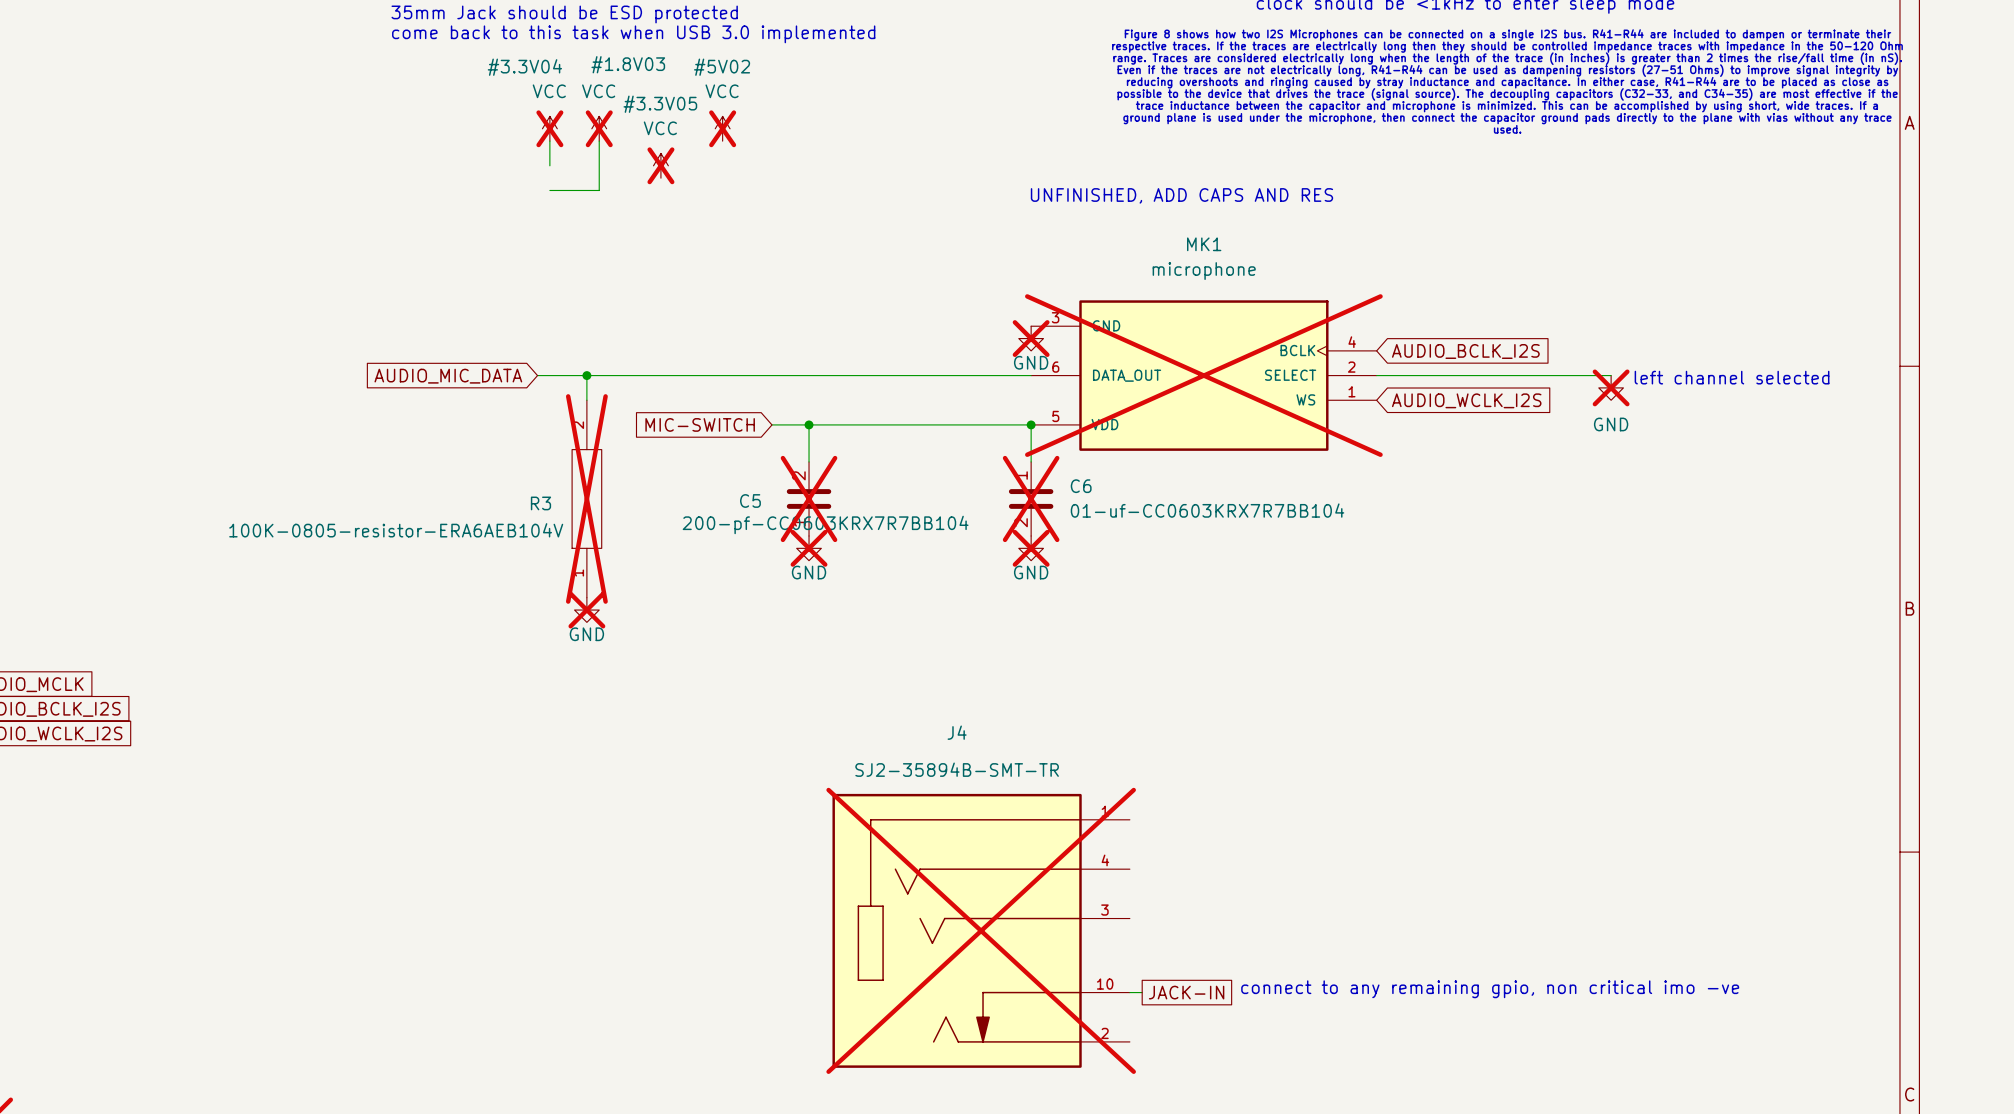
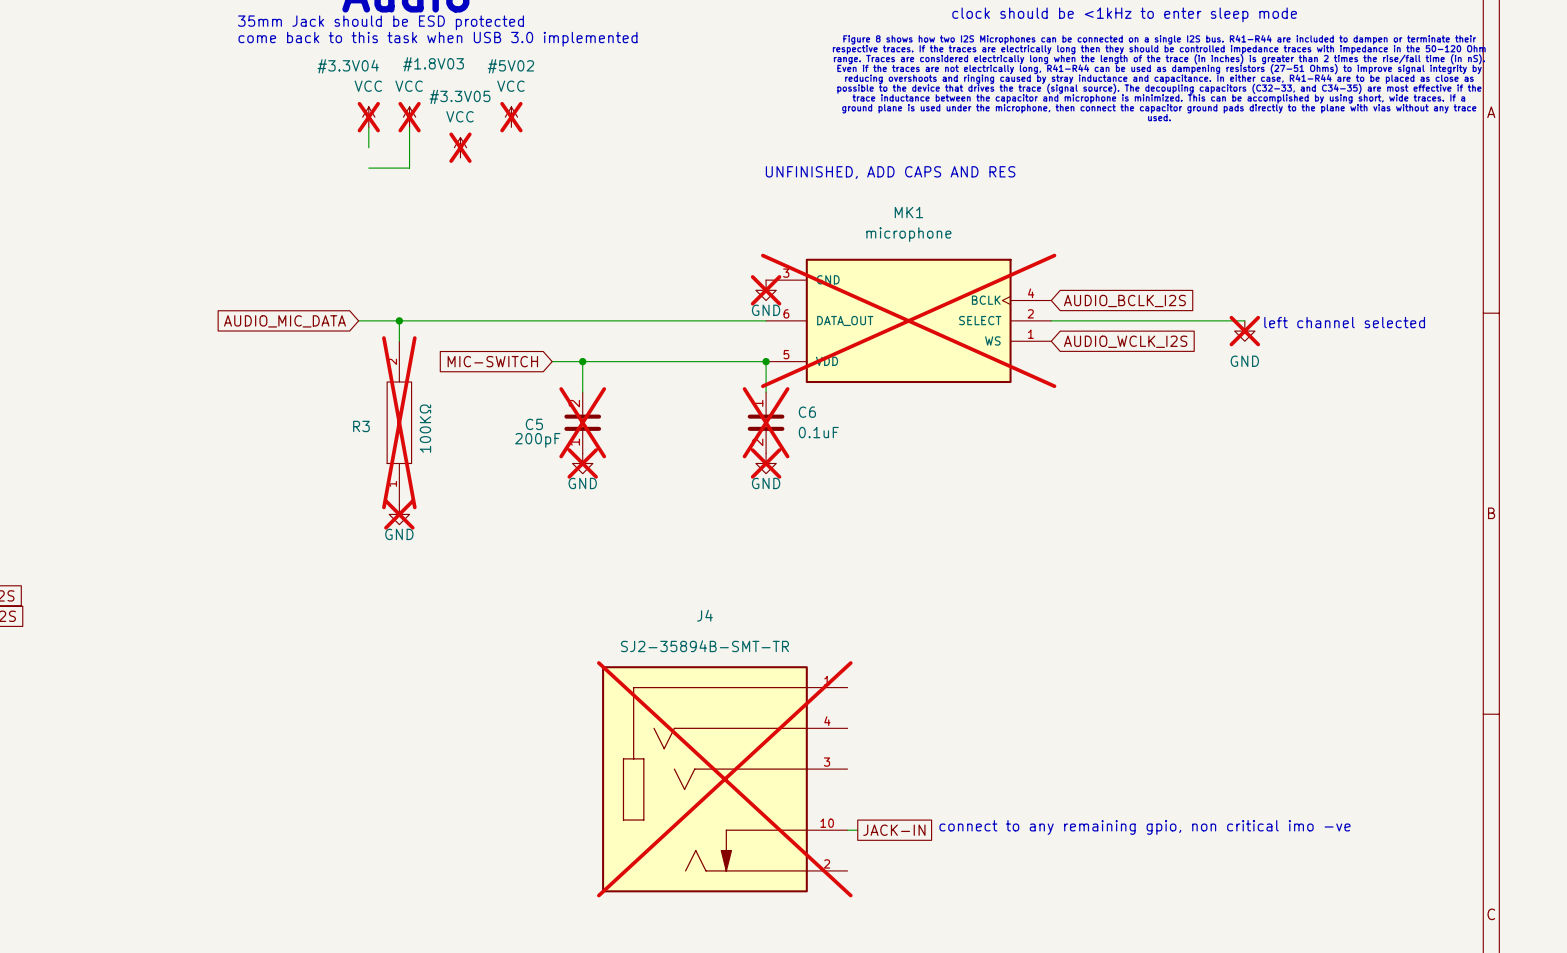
C6 value: 01-uf-CC0603KRX7R7BB104 (1207, 510) -> 0.1uF (818, 432)
C5 value: 200-pf-CC0603KRX7R7BB104 (825, 524) -> 200pF (537, 440)
R3 value: 100K-0805-resistor-ERA6AEB104V (396, 530) -> 100KΩ (425, 428)

